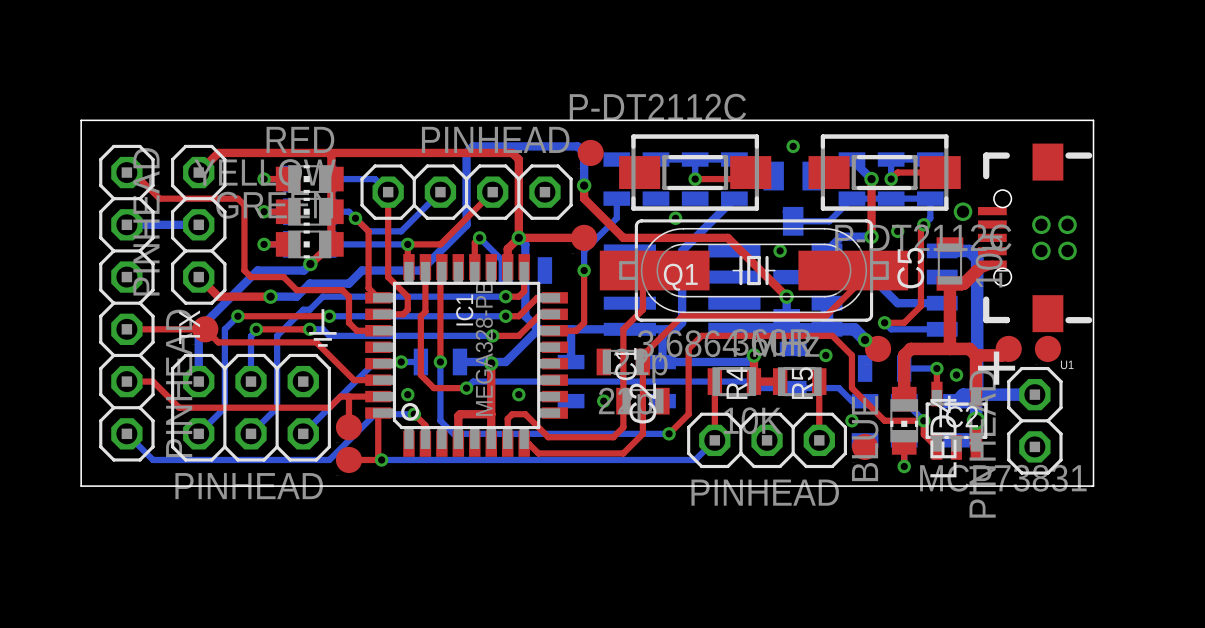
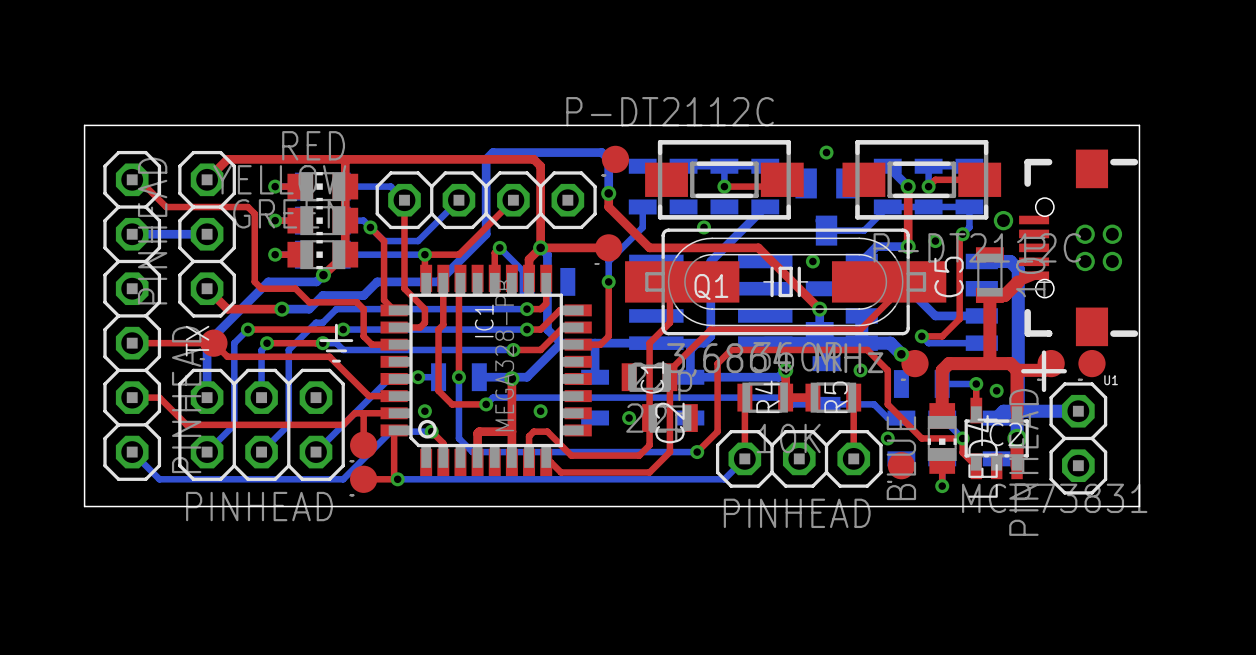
part value: PINHEAD (495, 139) -> none

